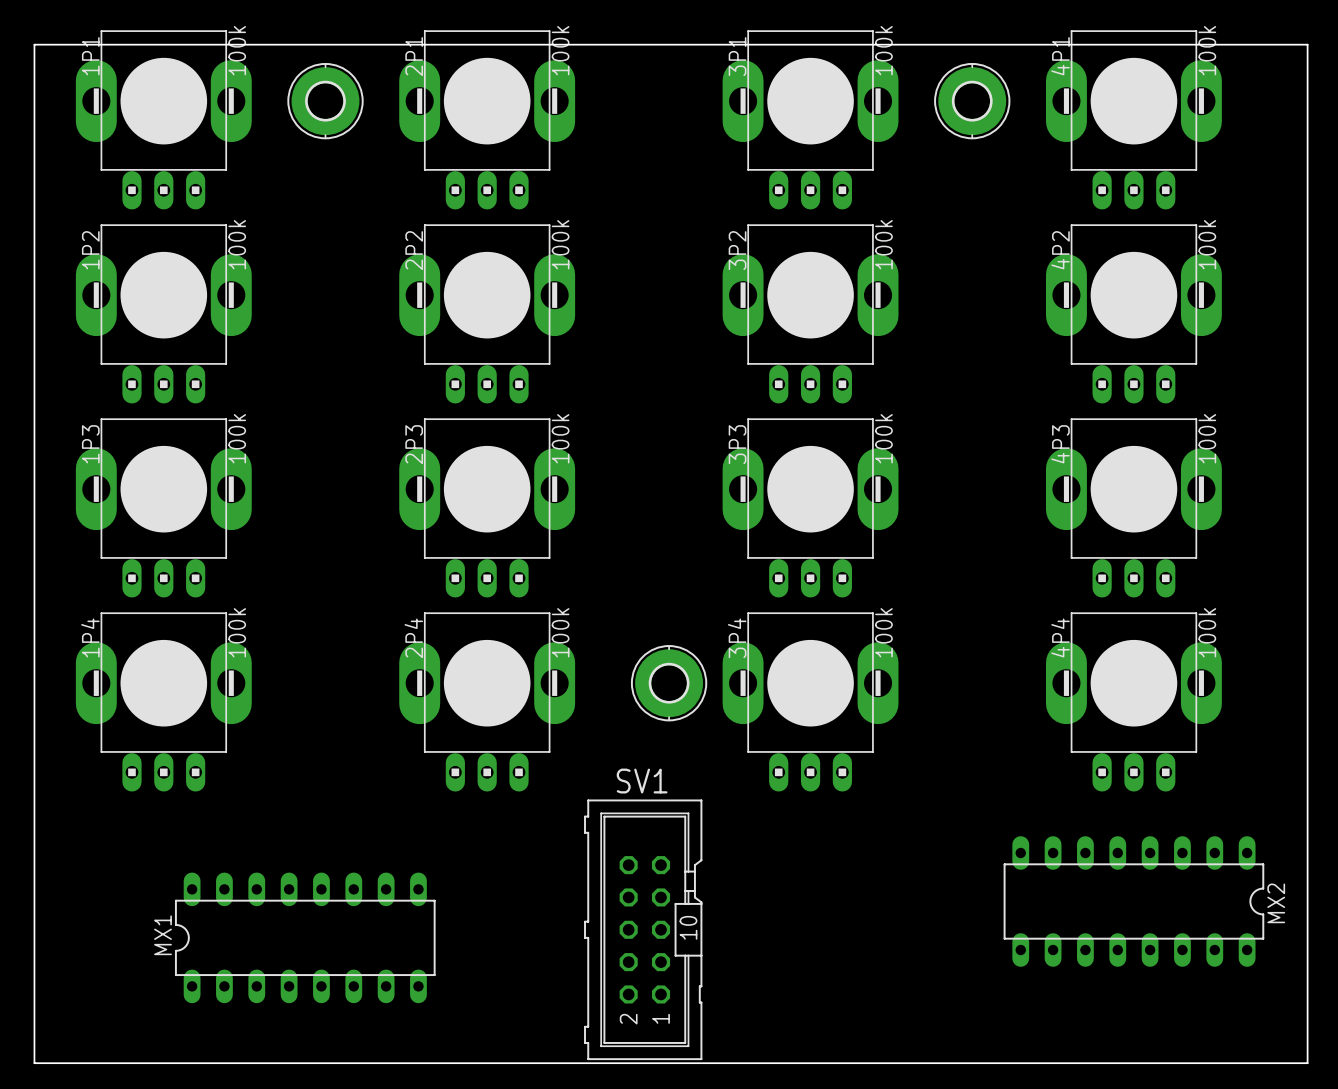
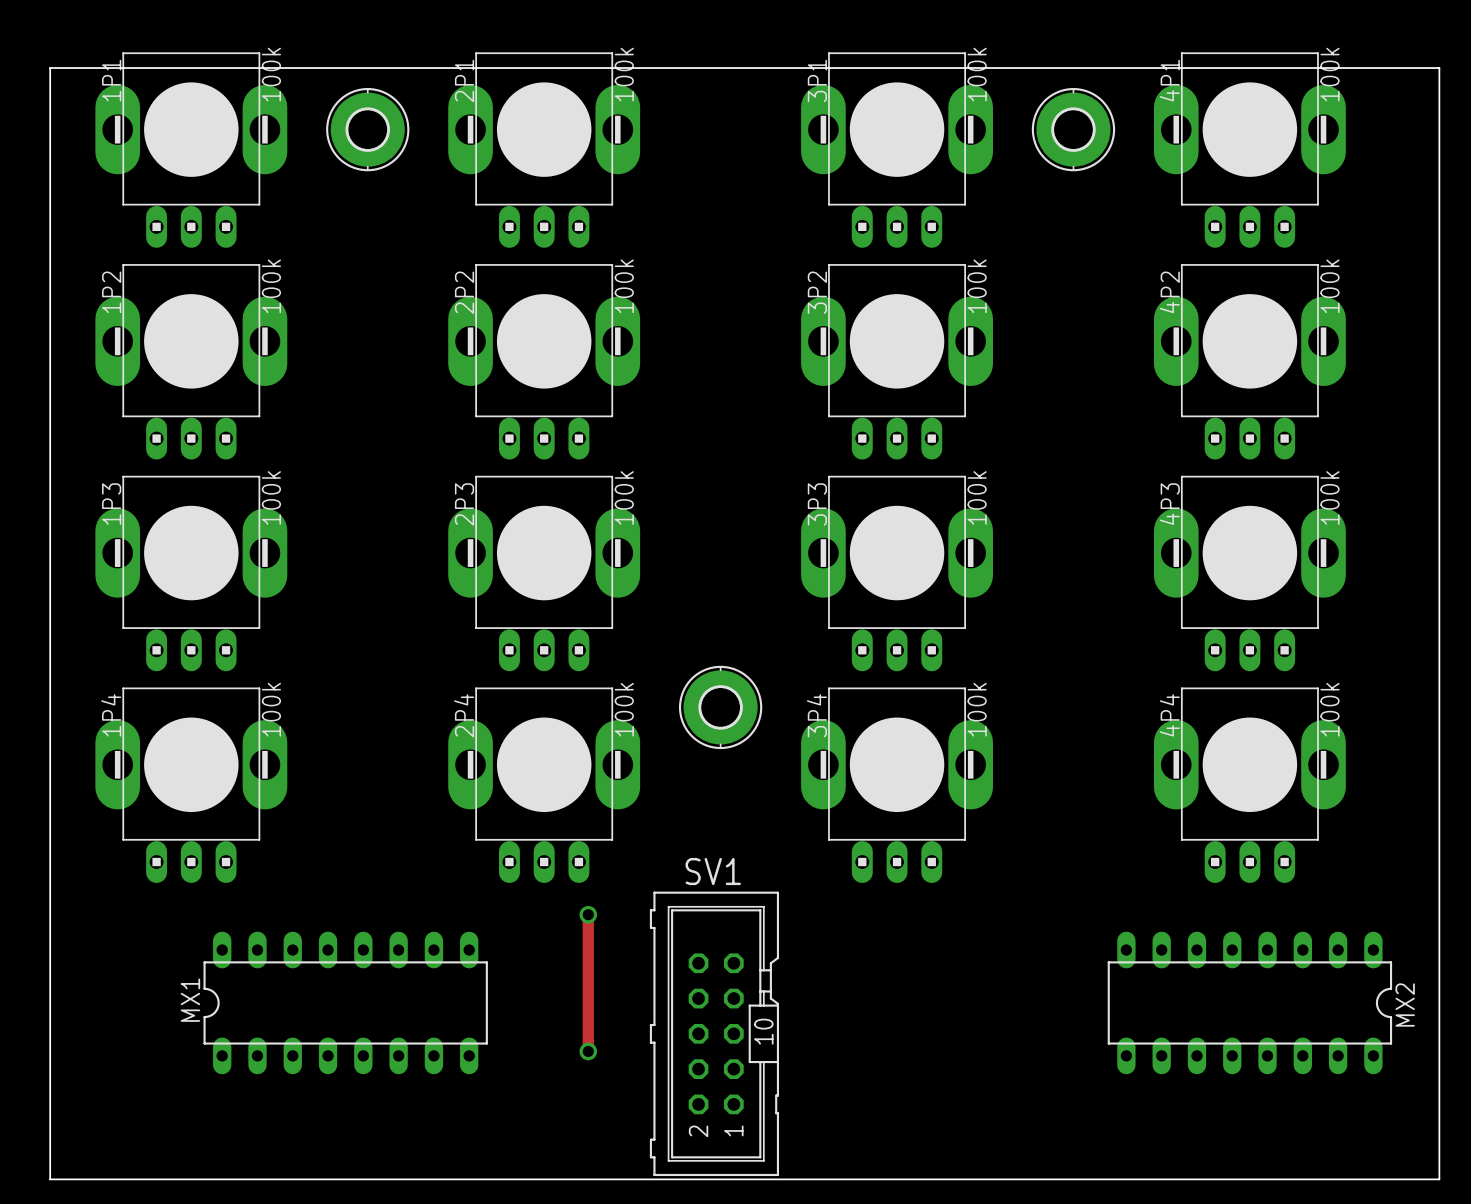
part position: (669, 683) -> (720, 707)
track: none -> (588, 914) (588, 1051)
via: none -> (588, 914)
MX1 position: (305, 937) -> (345, 1002)
via: none -> (588, 1051)

